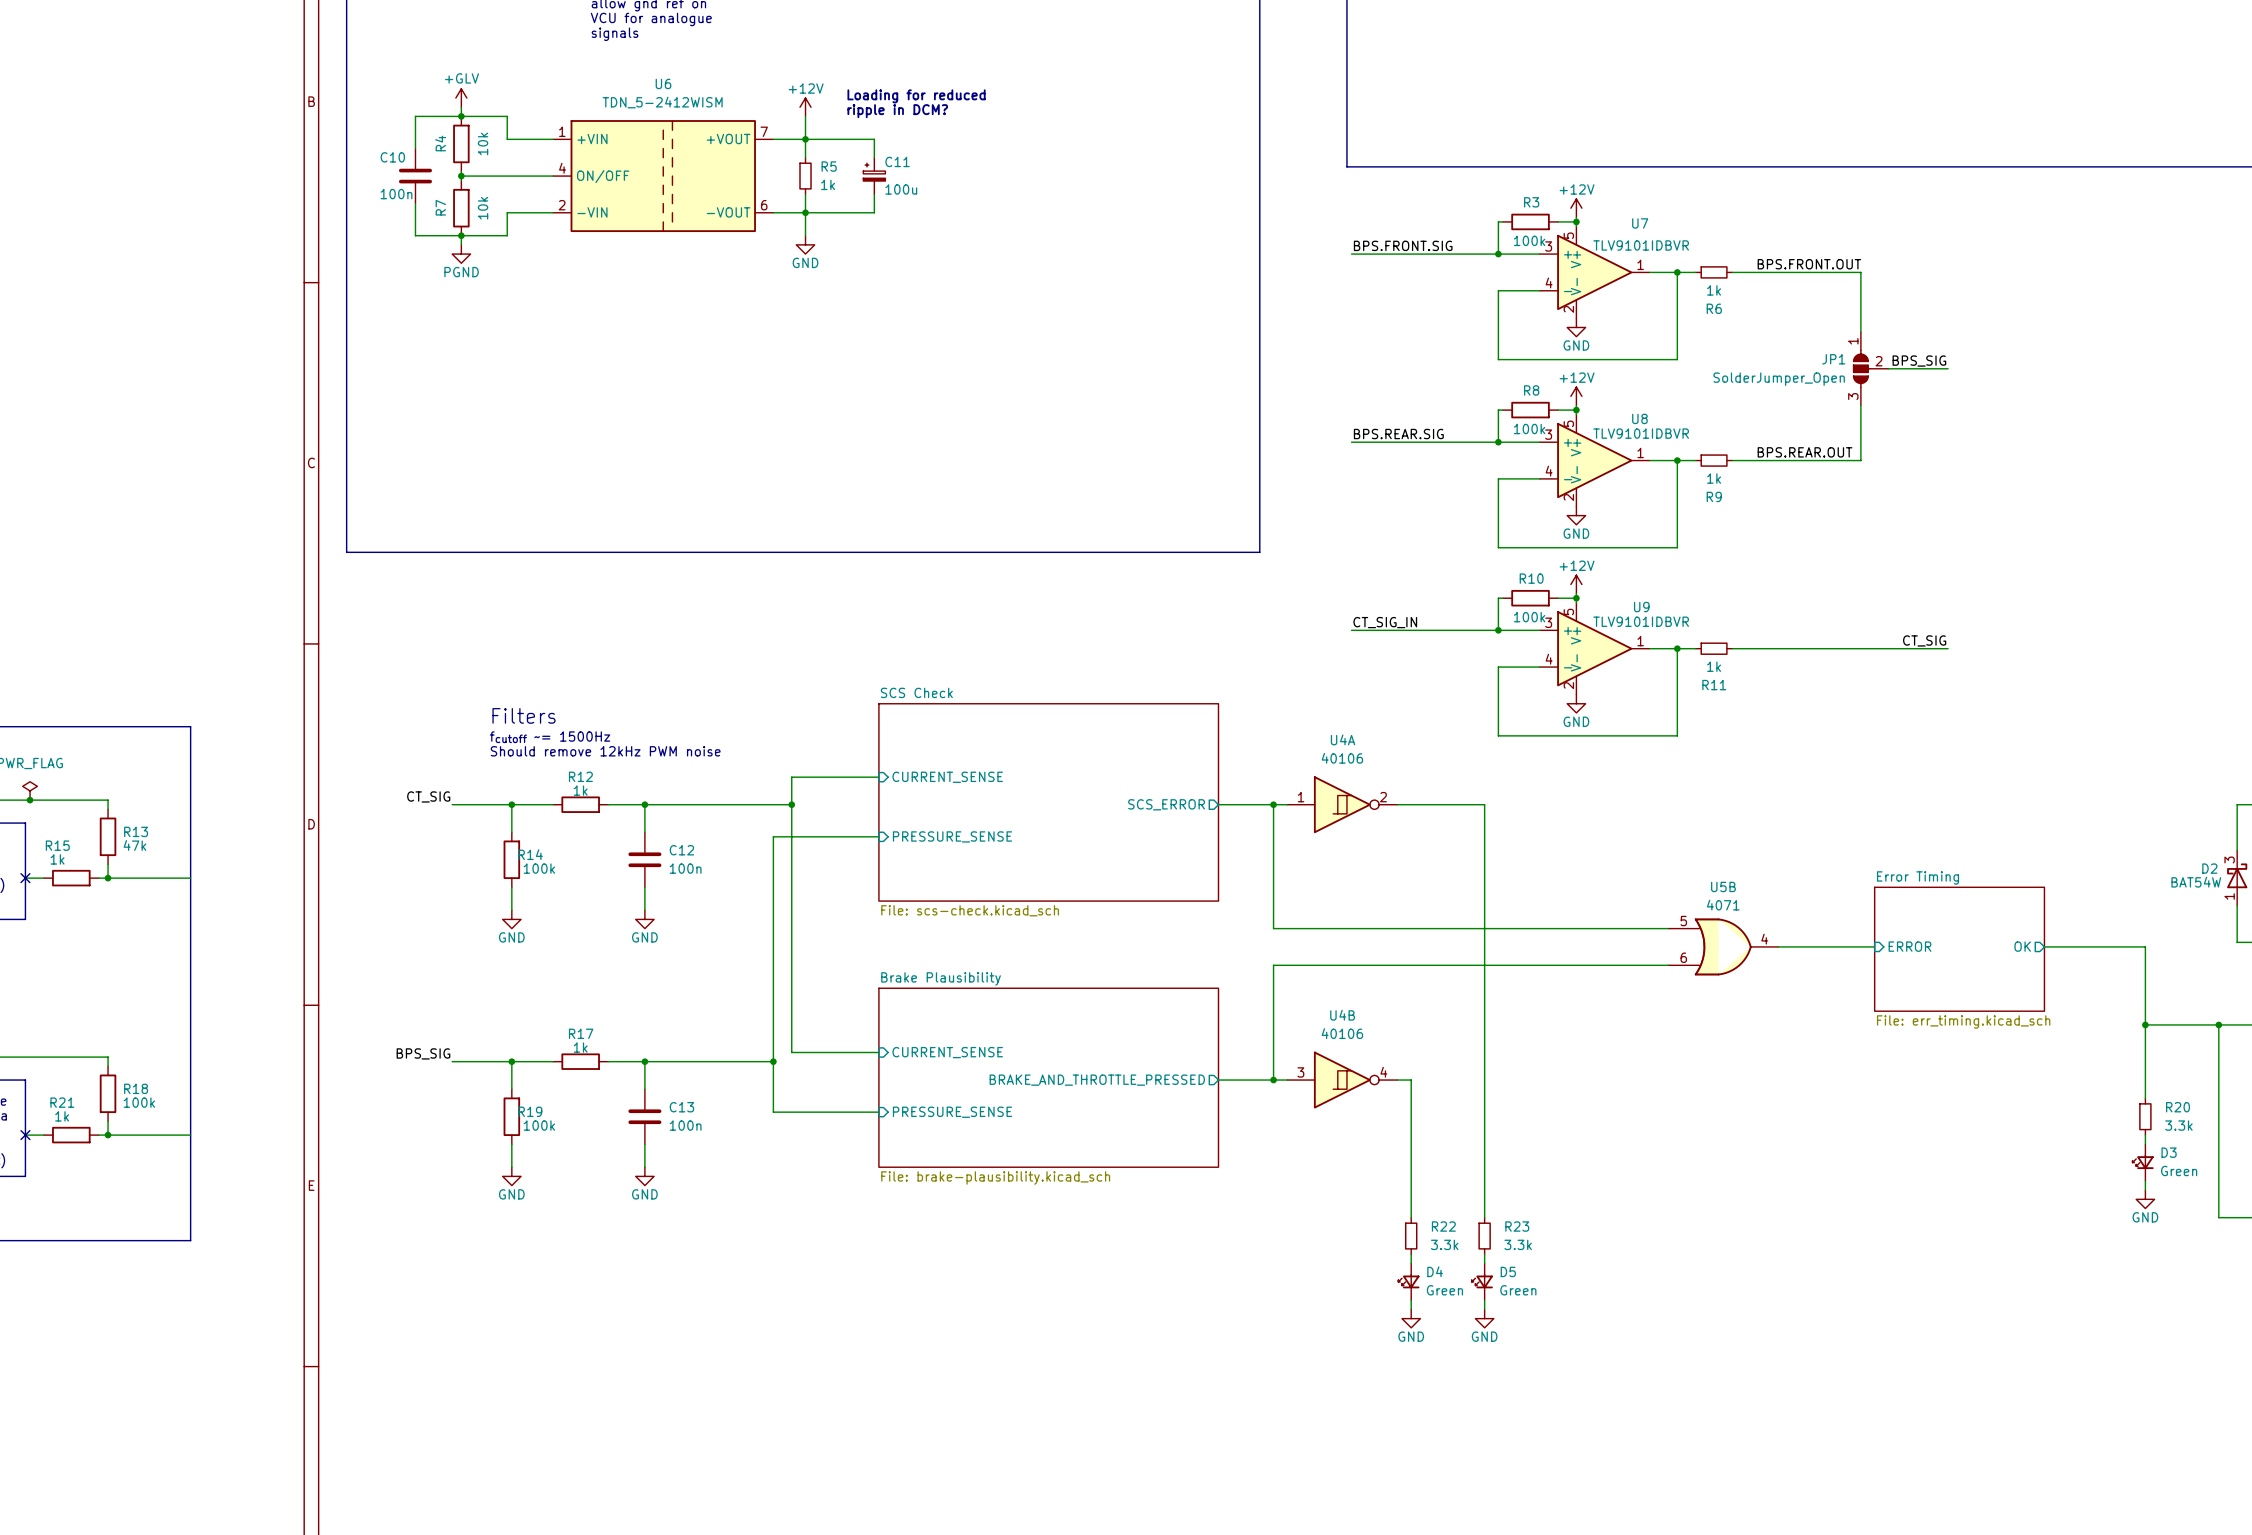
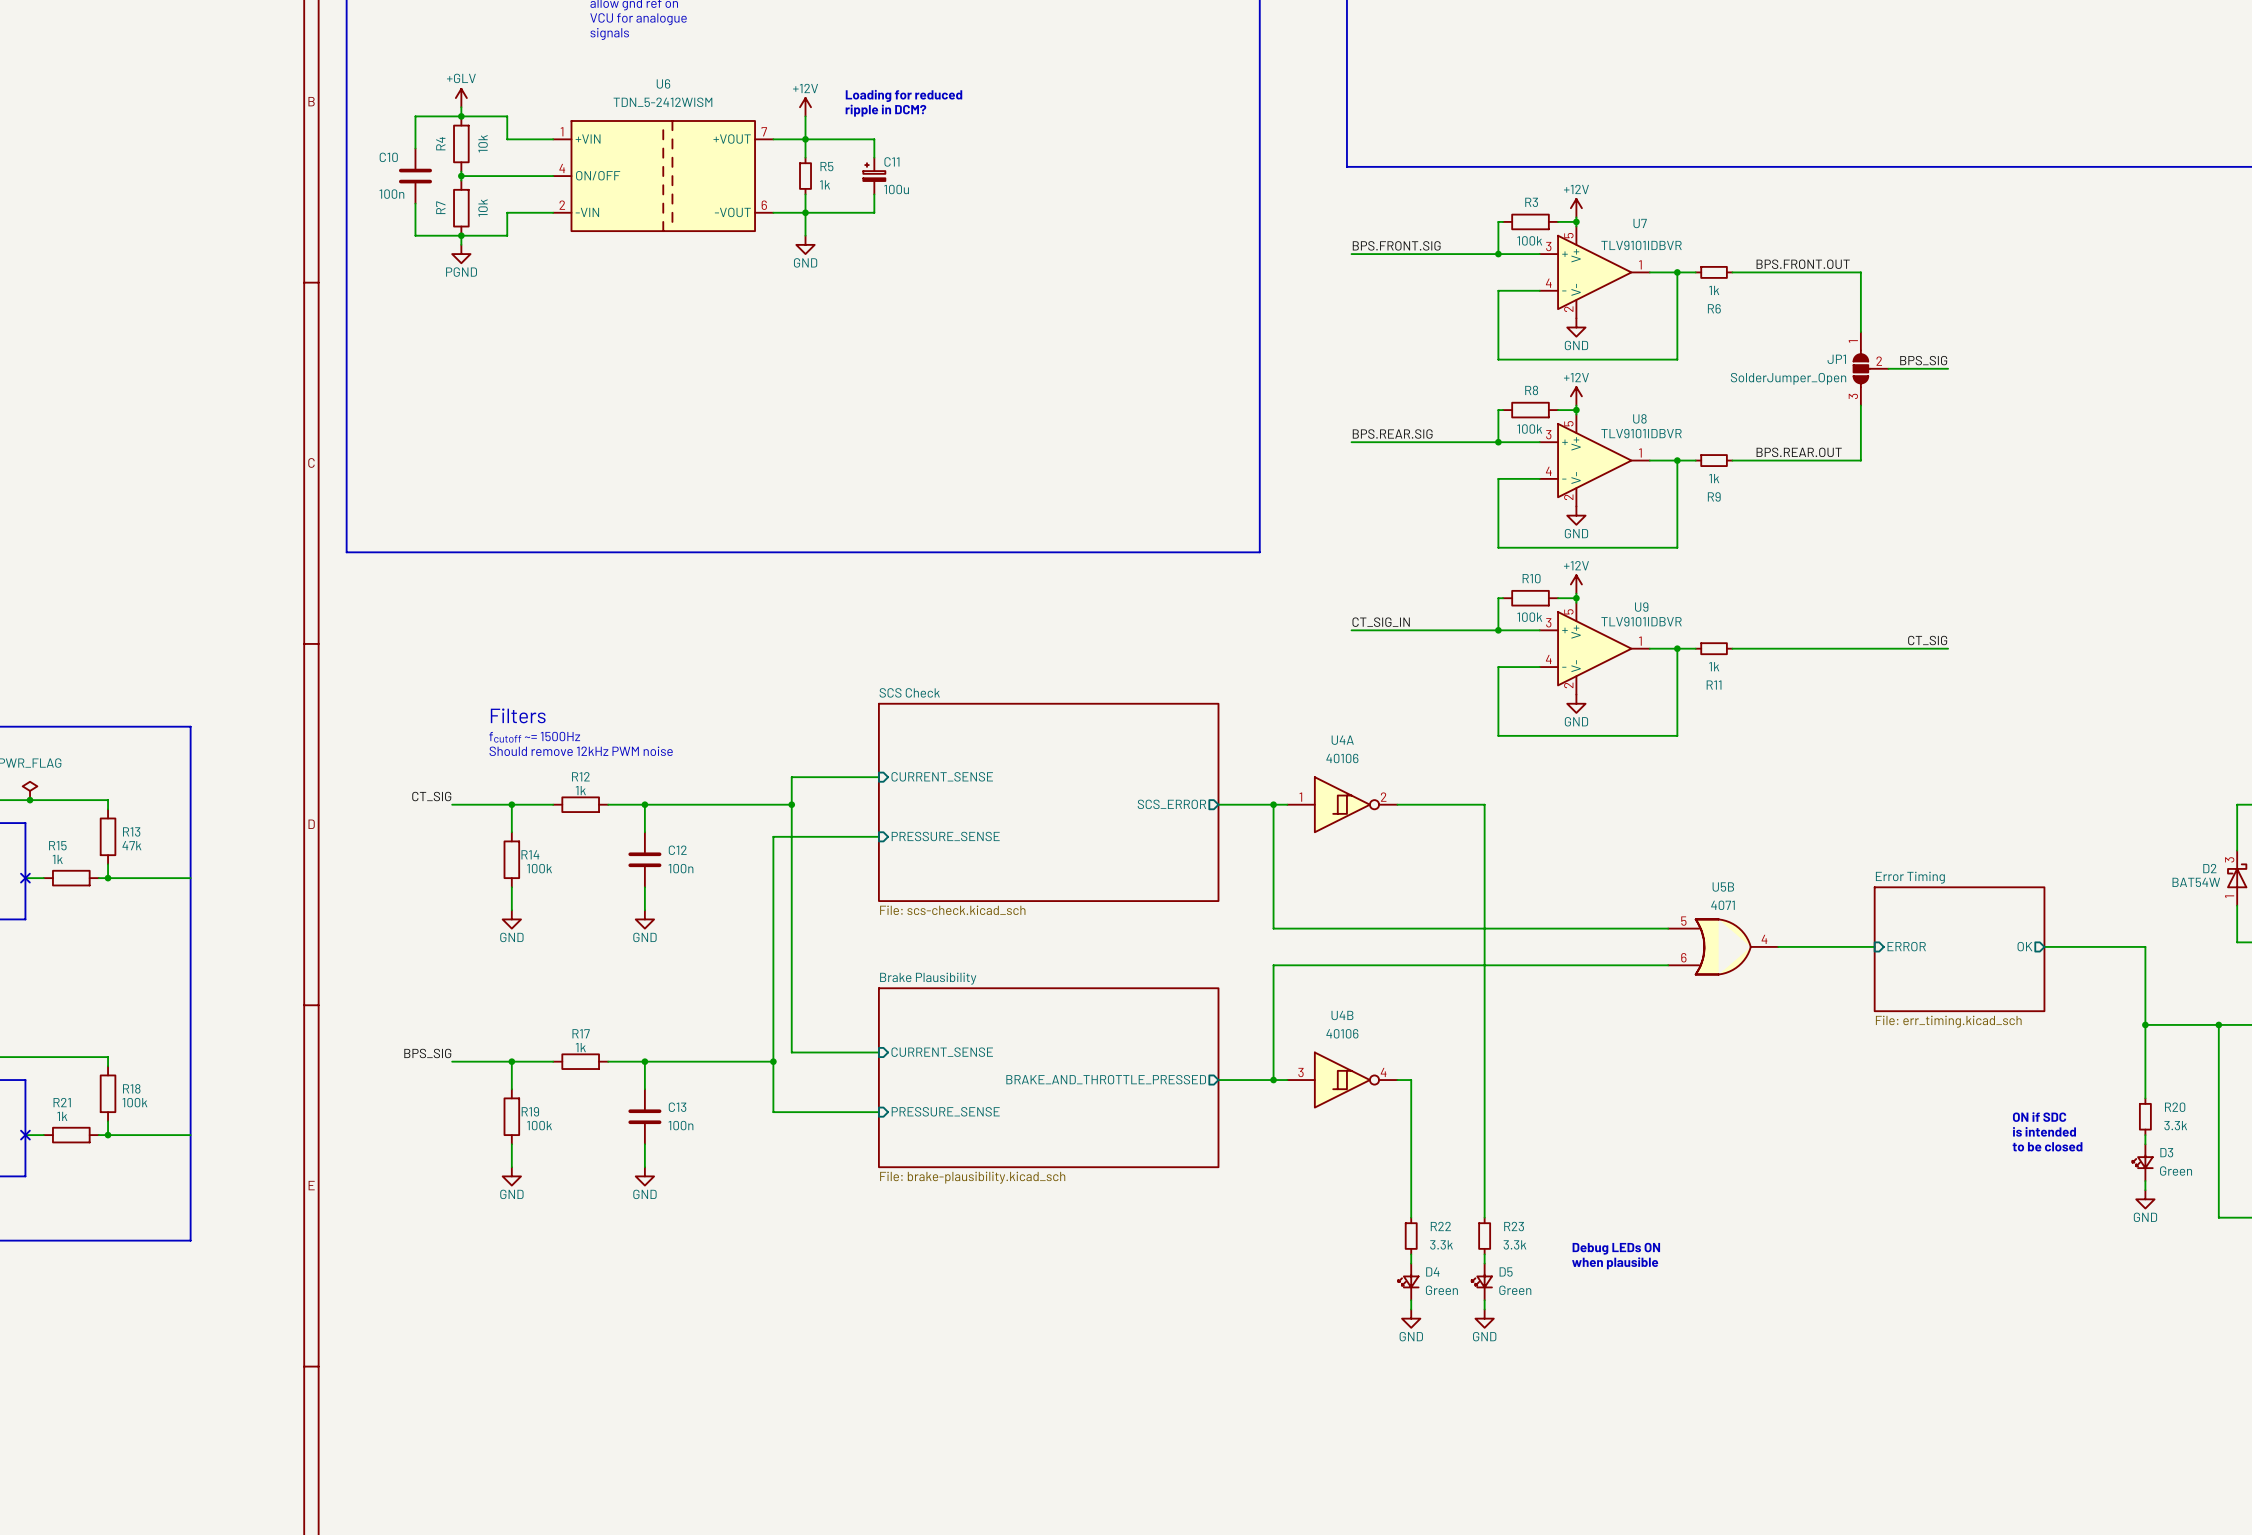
text: none -> ON if SDC (2039, 1117)
text: none -> is intended (2044, 1131)
text: none -> to be closed (2047, 1146)
text: none -> Debug LEDs ON (1616, 1248)
text: none -> when plausible (1615, 1263)

